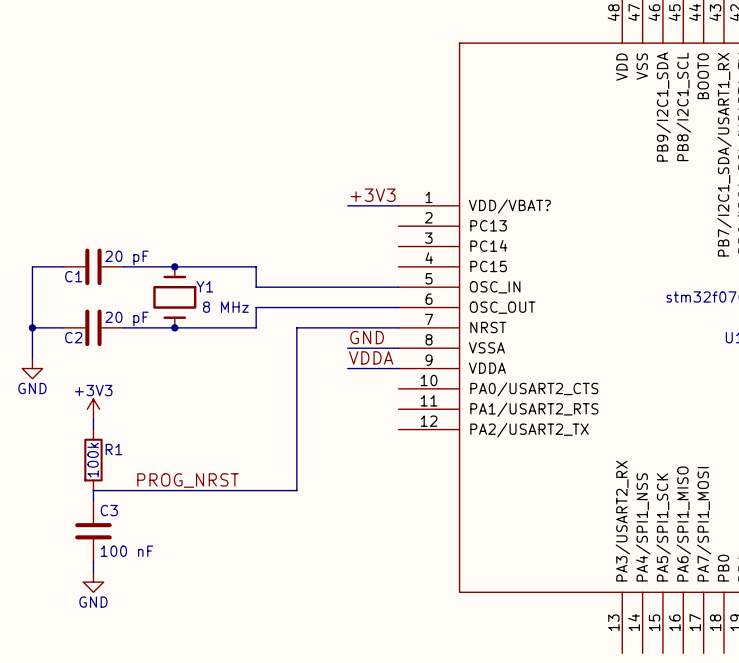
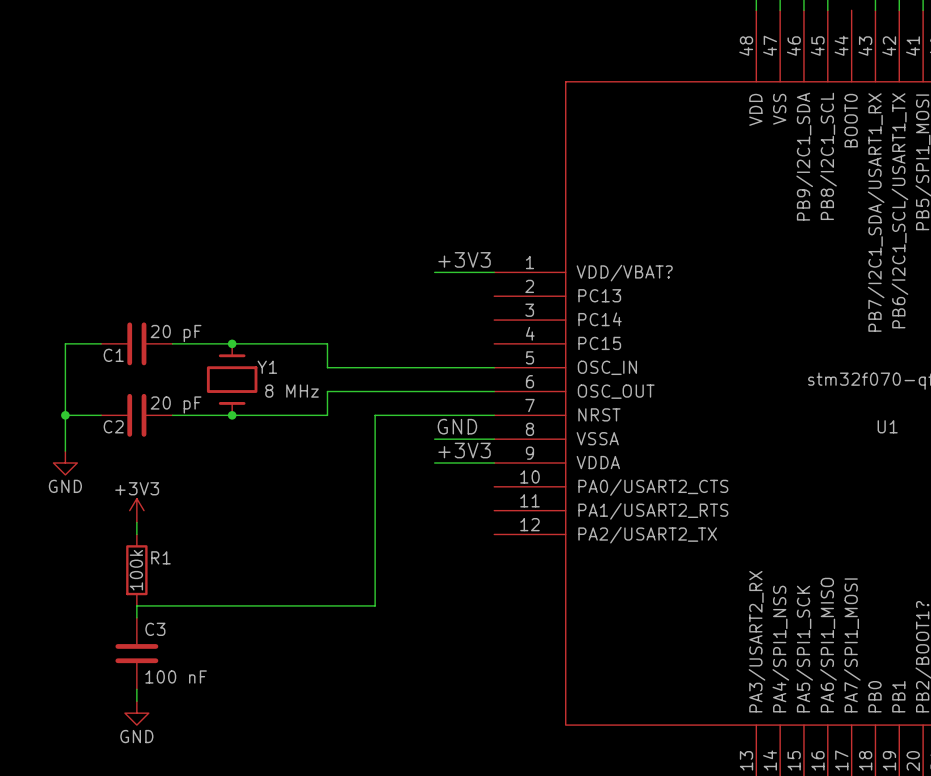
label: VDDA (371, 357) -> +3V3 (464, 450)
label: PROG_NRST (188, 480) -> none

